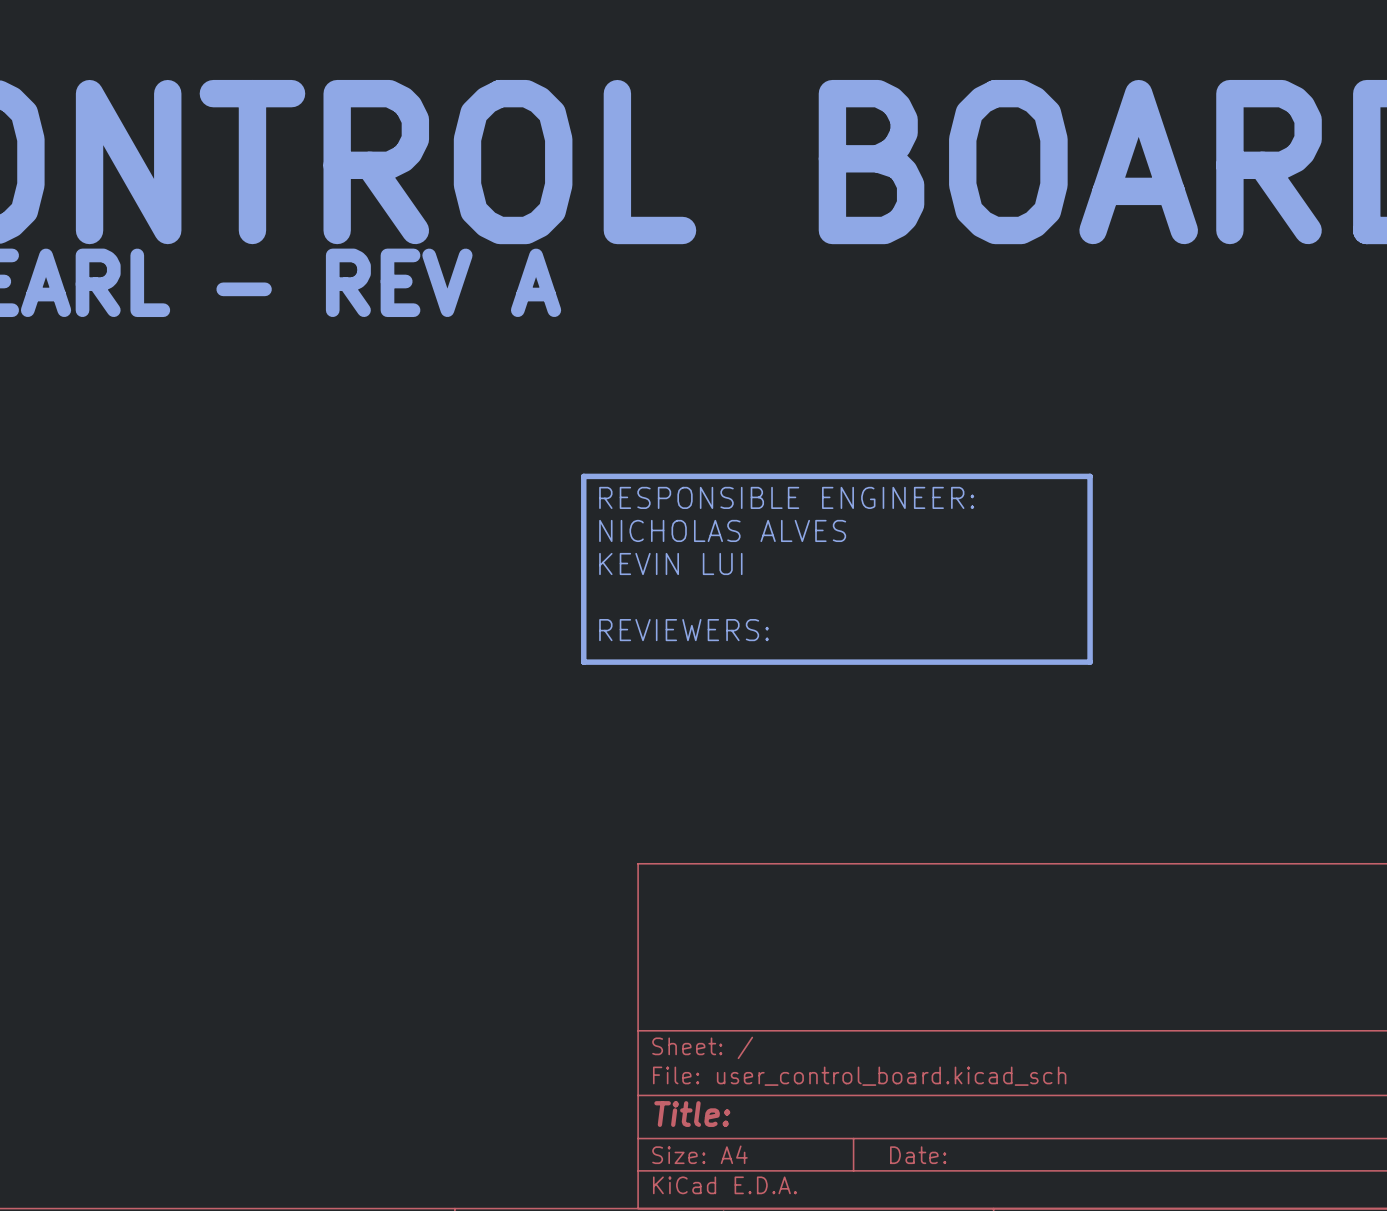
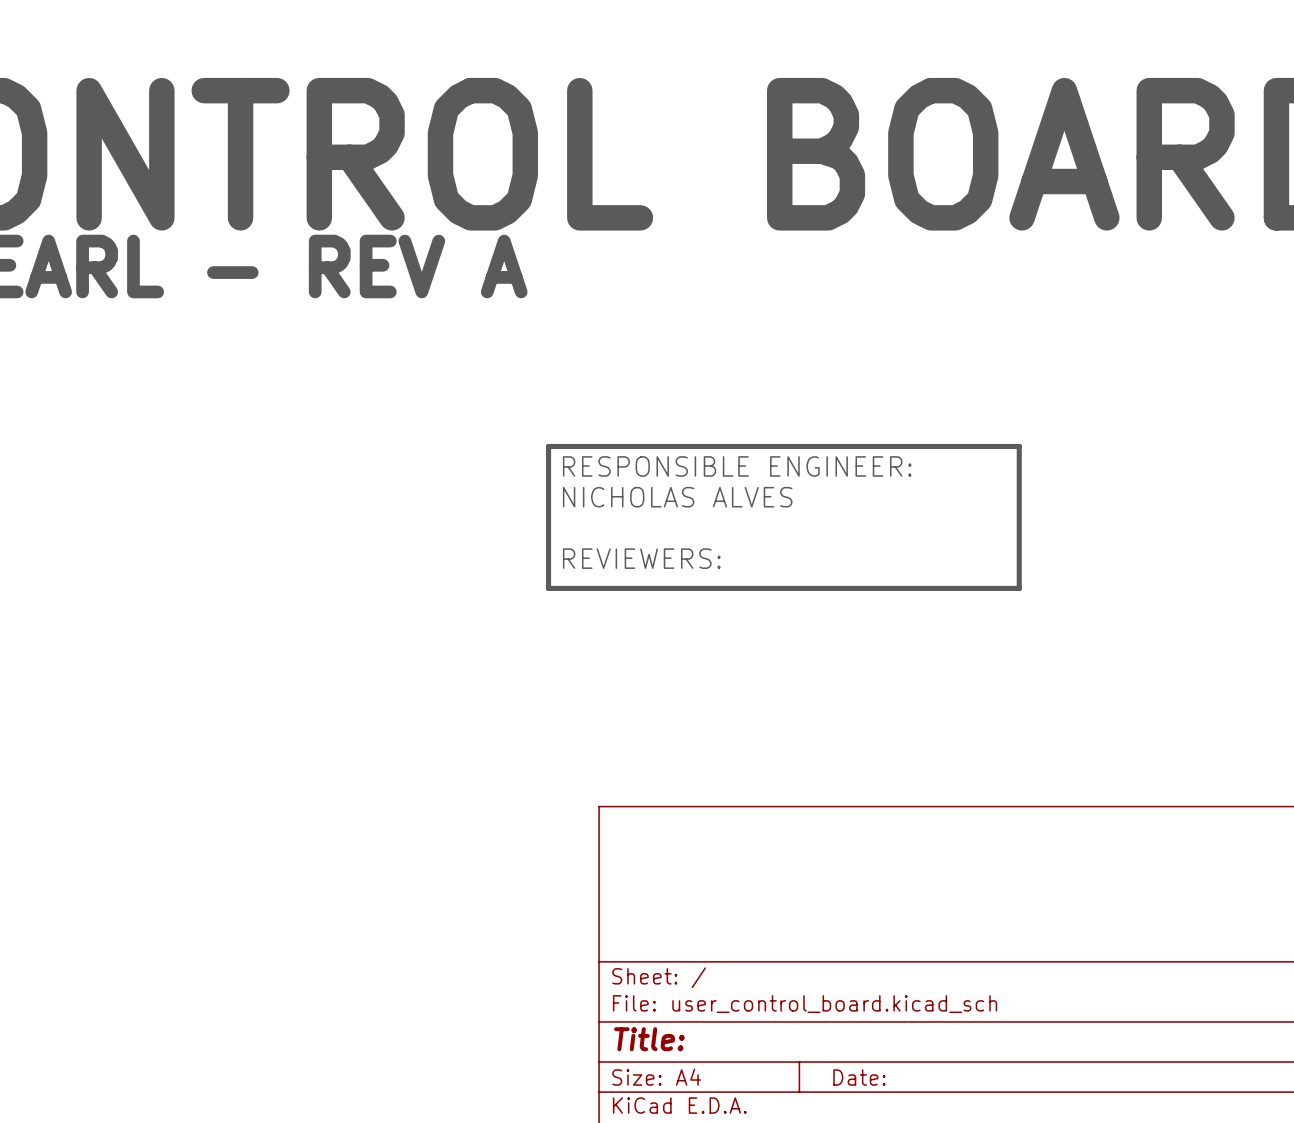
text: KEVIN LUI (670, 564) -> none
line: (583, 629) (583, 662) (1090, 662) (1090, 629) -> (548, 588) (1019, 588)
text position: REVIEWERS: (684, 630) -> REVIEWERS: (641, 558)

